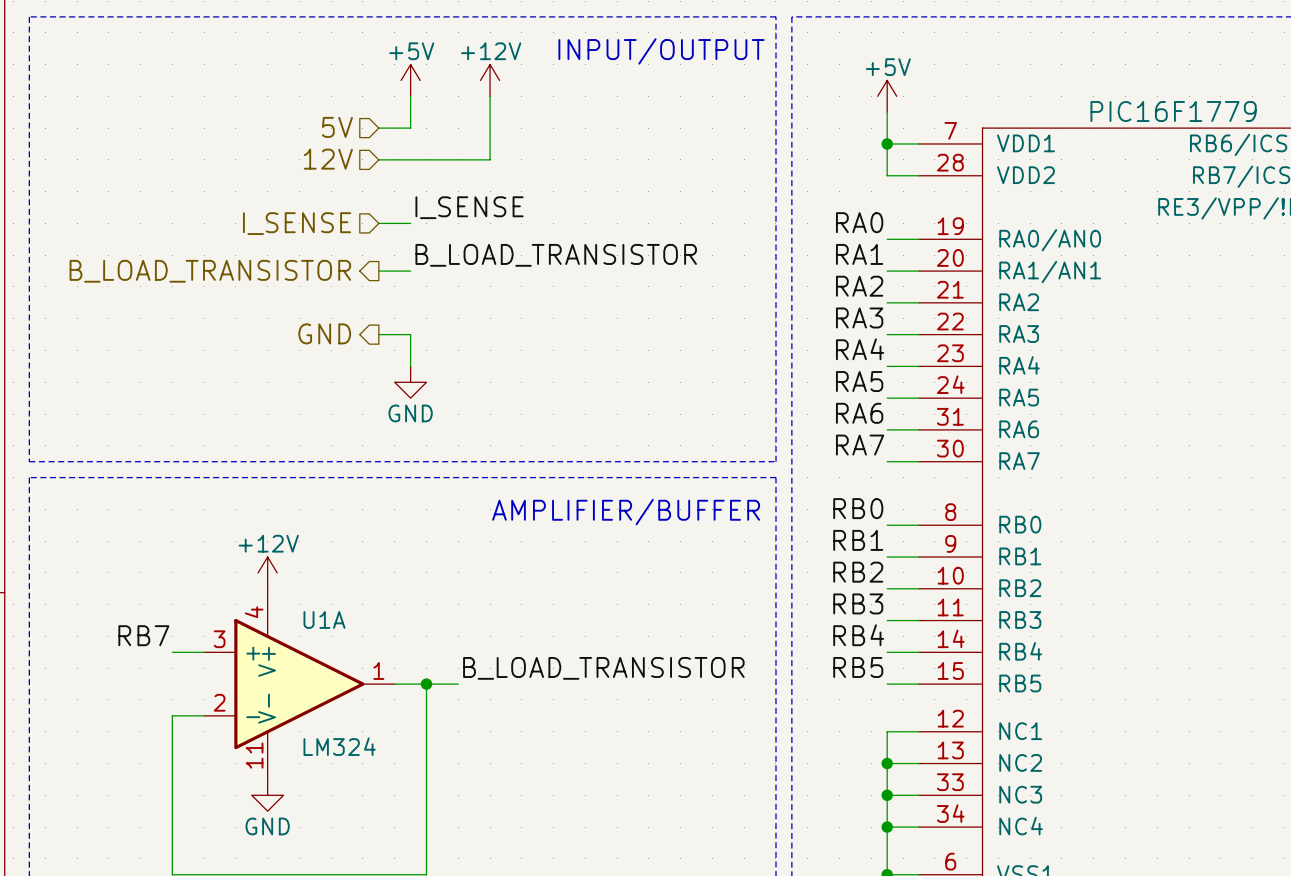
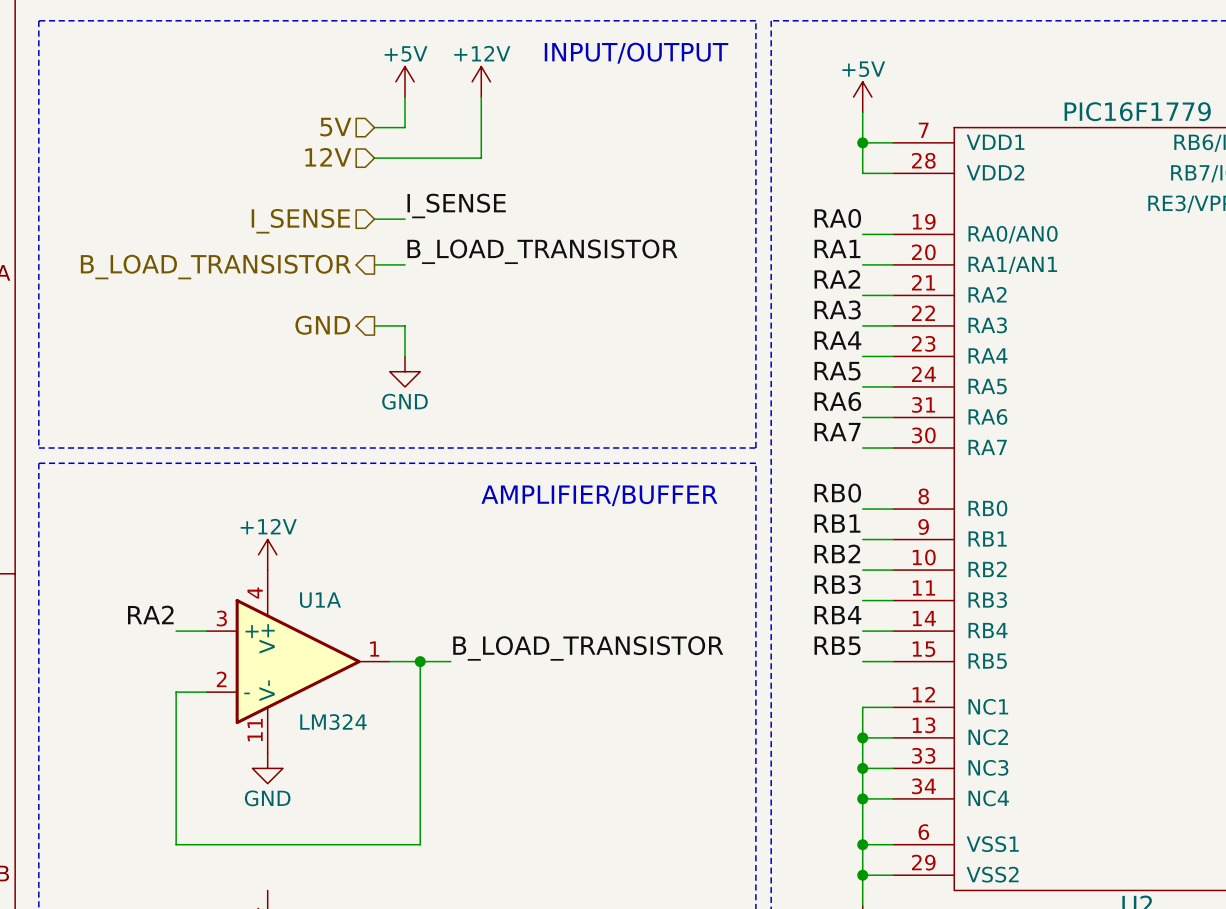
label: RB7 (143, 635) -> RA2 (150, 614)

